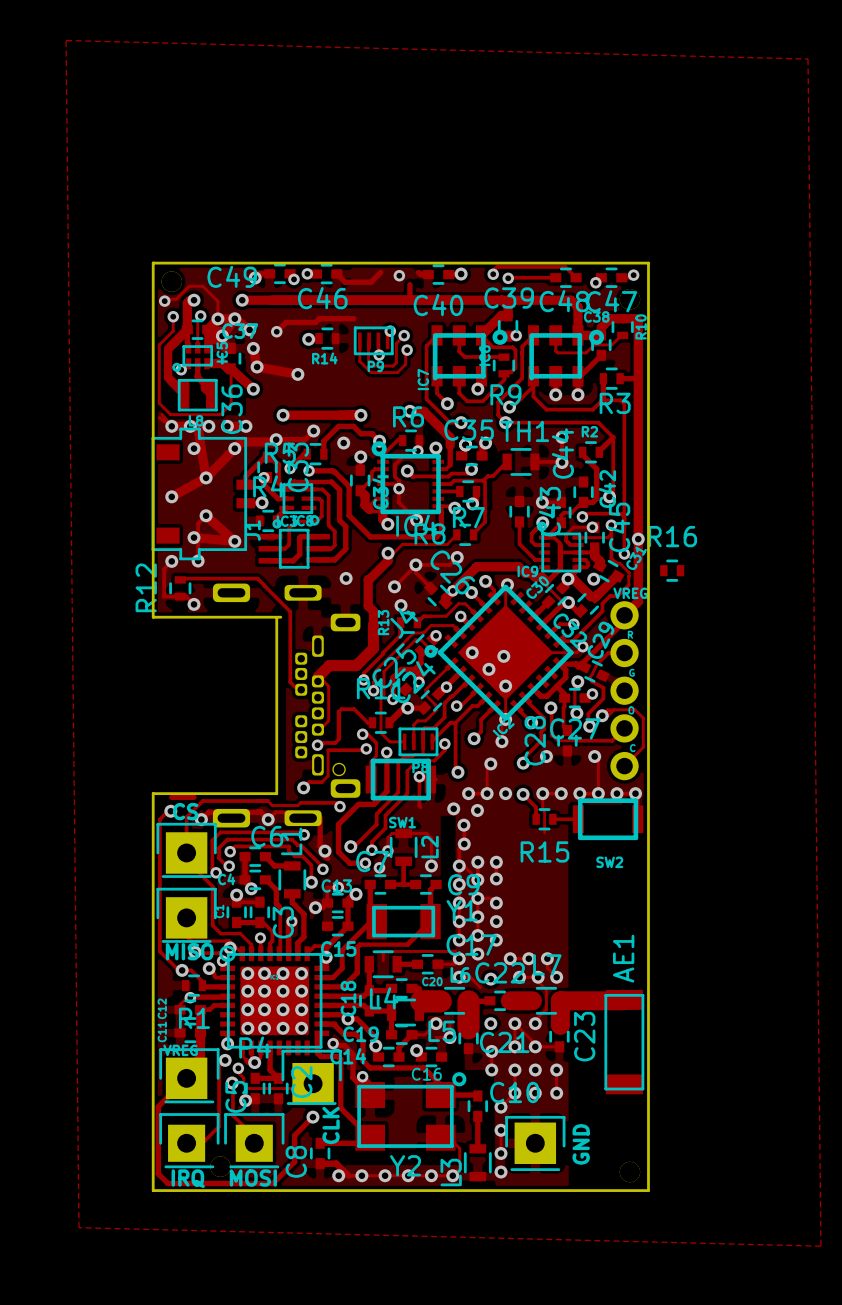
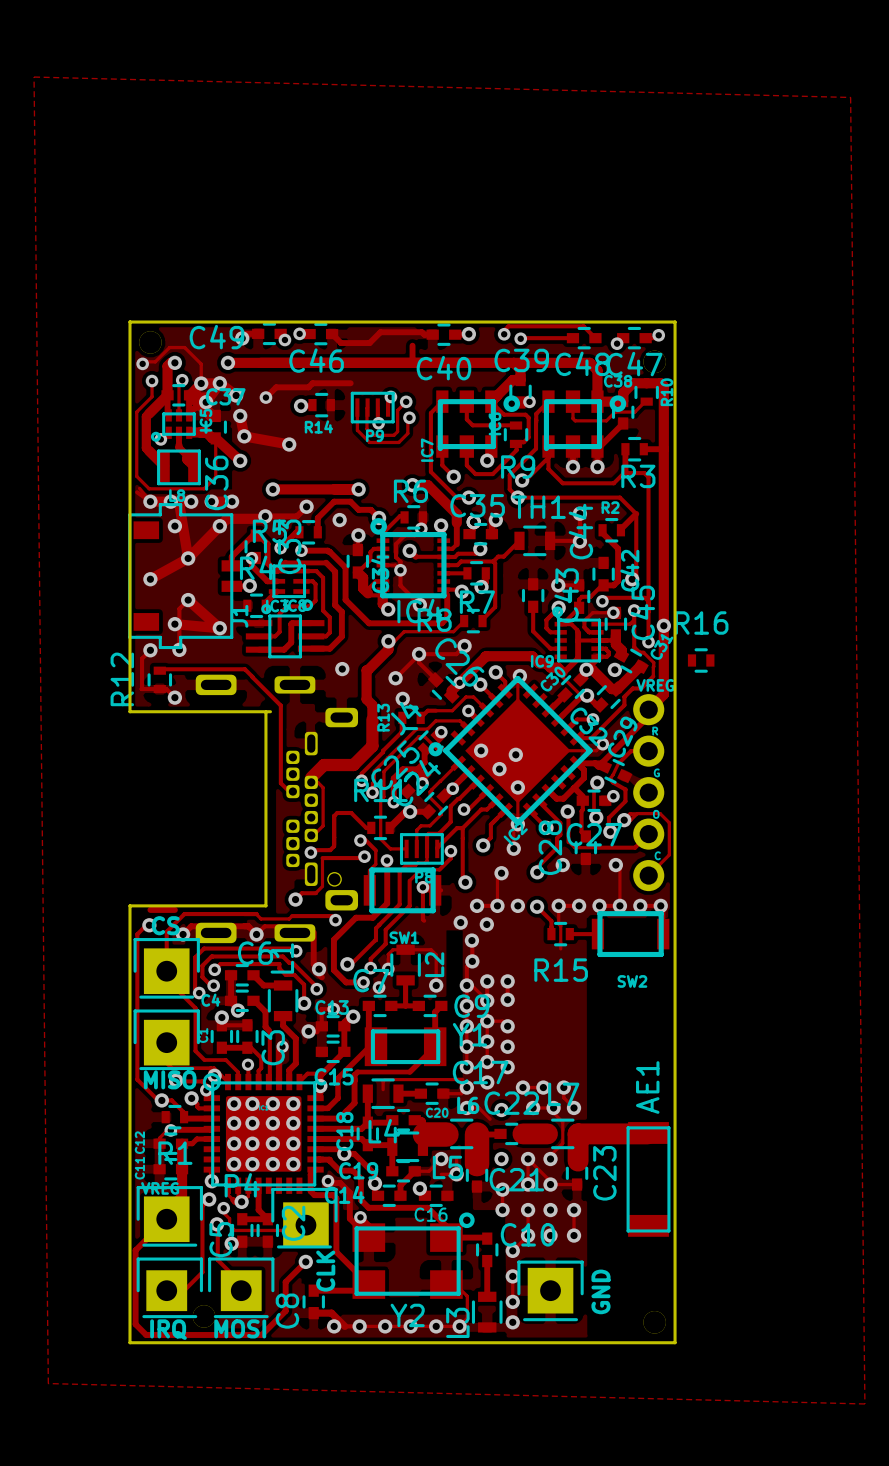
track: none -> (380, 332) (421, 332)
via: (399, 275) -> none

